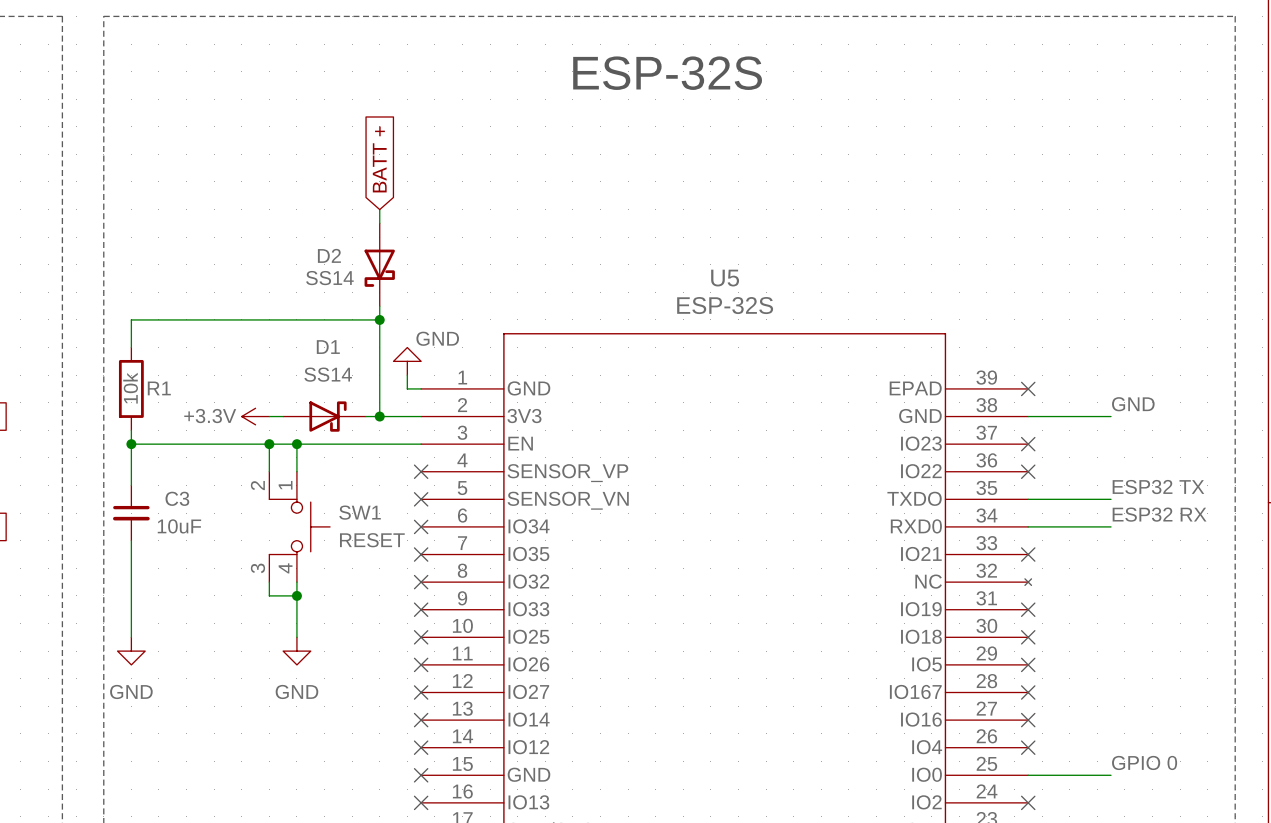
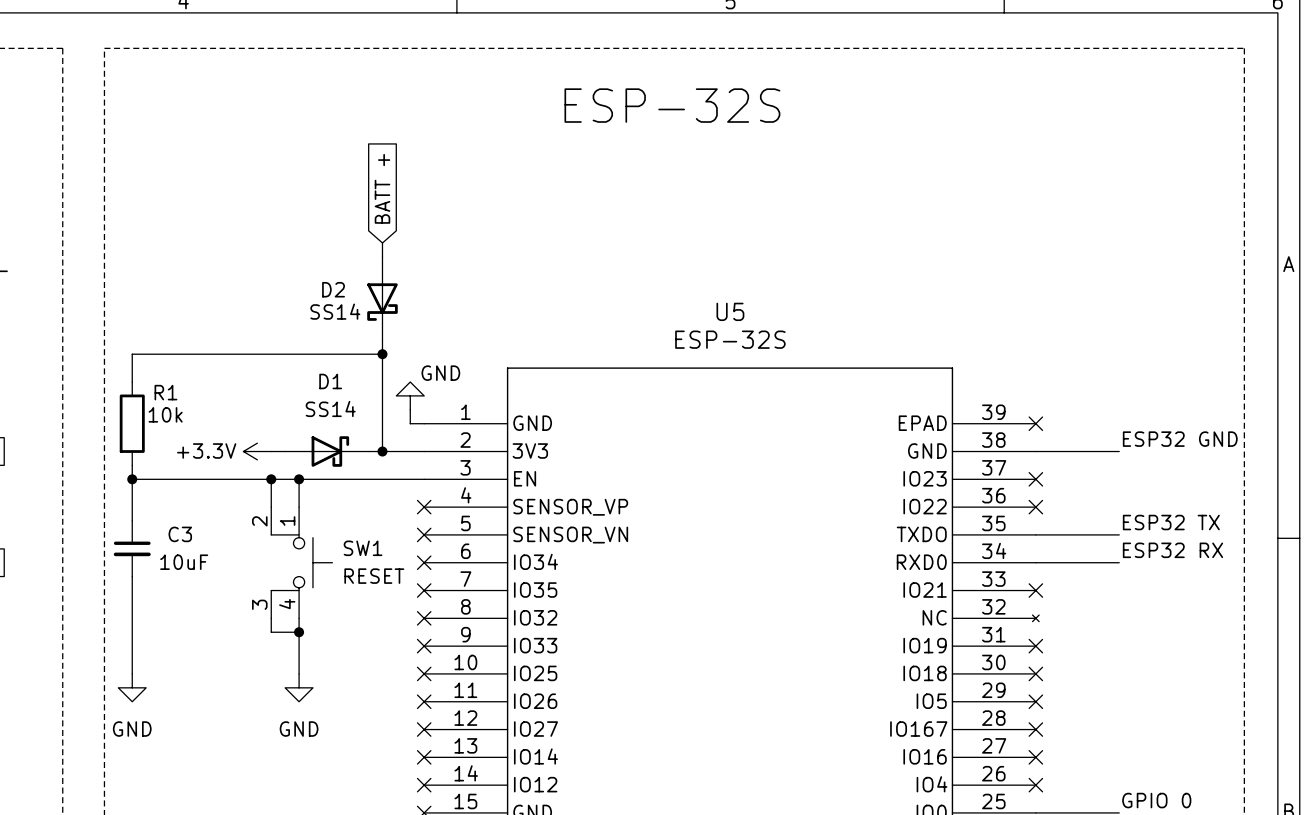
R1 value rotation: 0° (130, 388) -> 90° clockwise (165, 414)
R1 name position: R1 (159, 388) -> R1 (165, 392)
label: GND (1133, 404) -> ESP32 GND (1180, 439)

